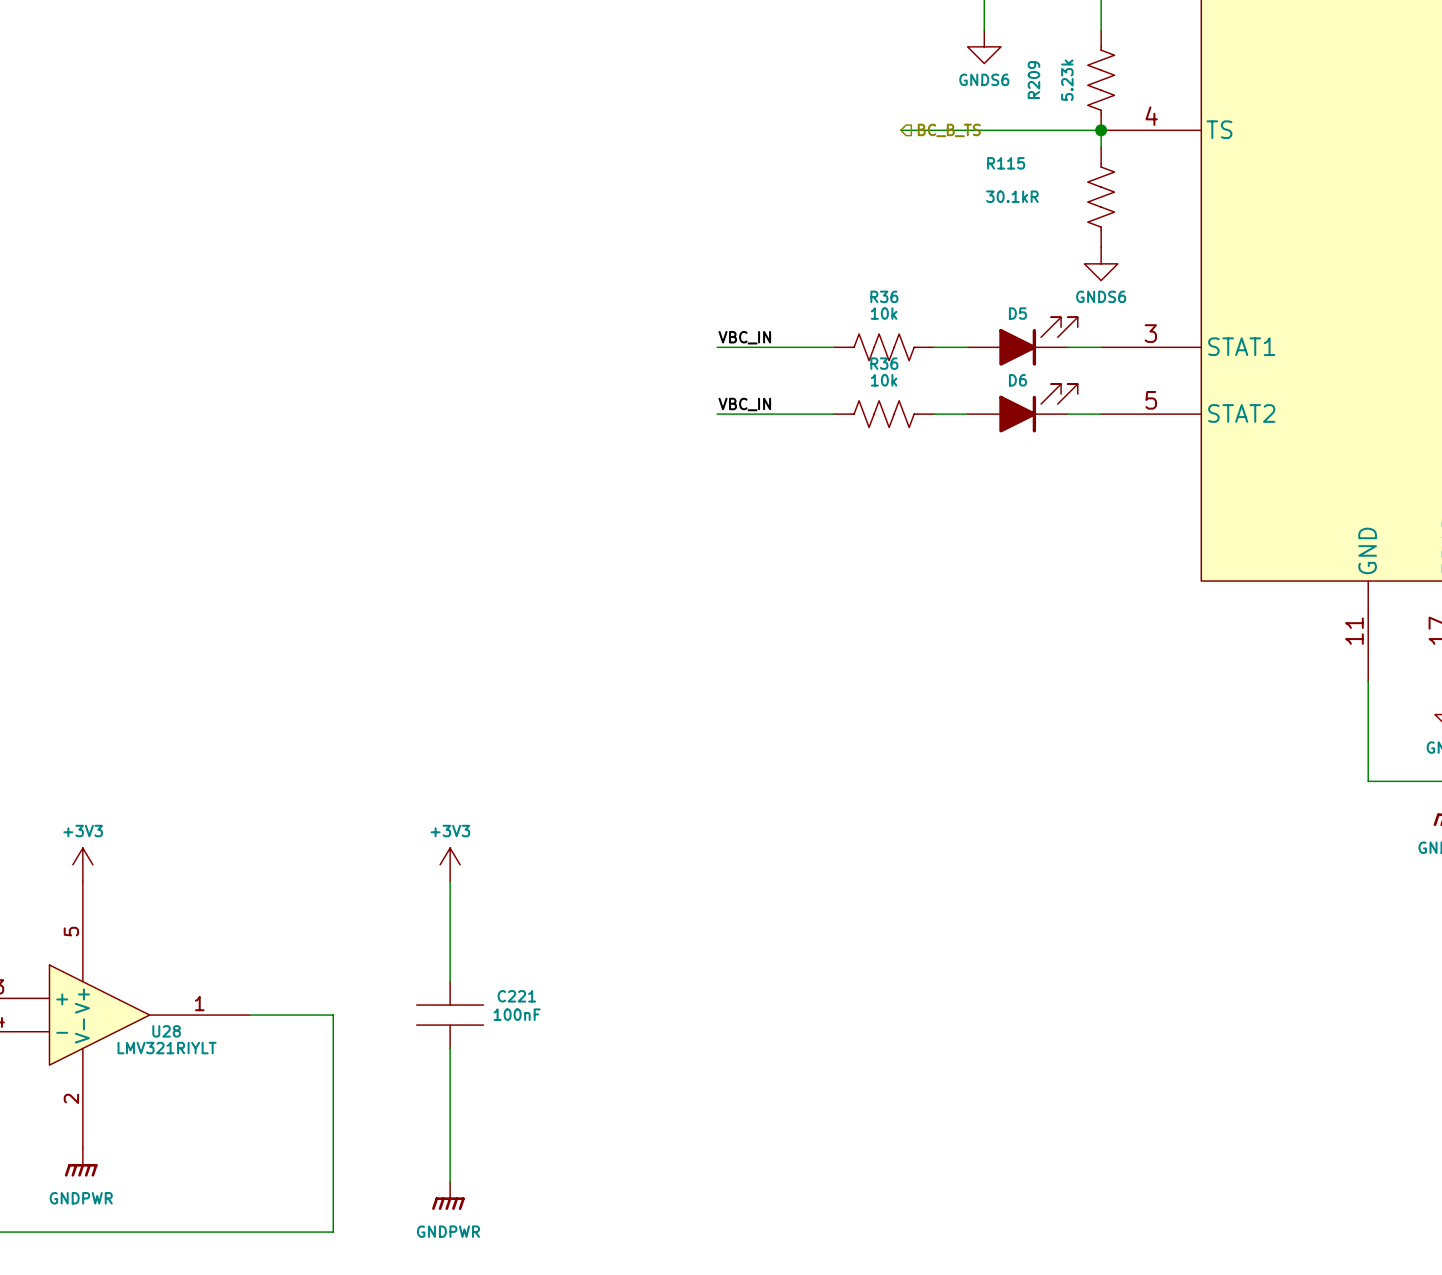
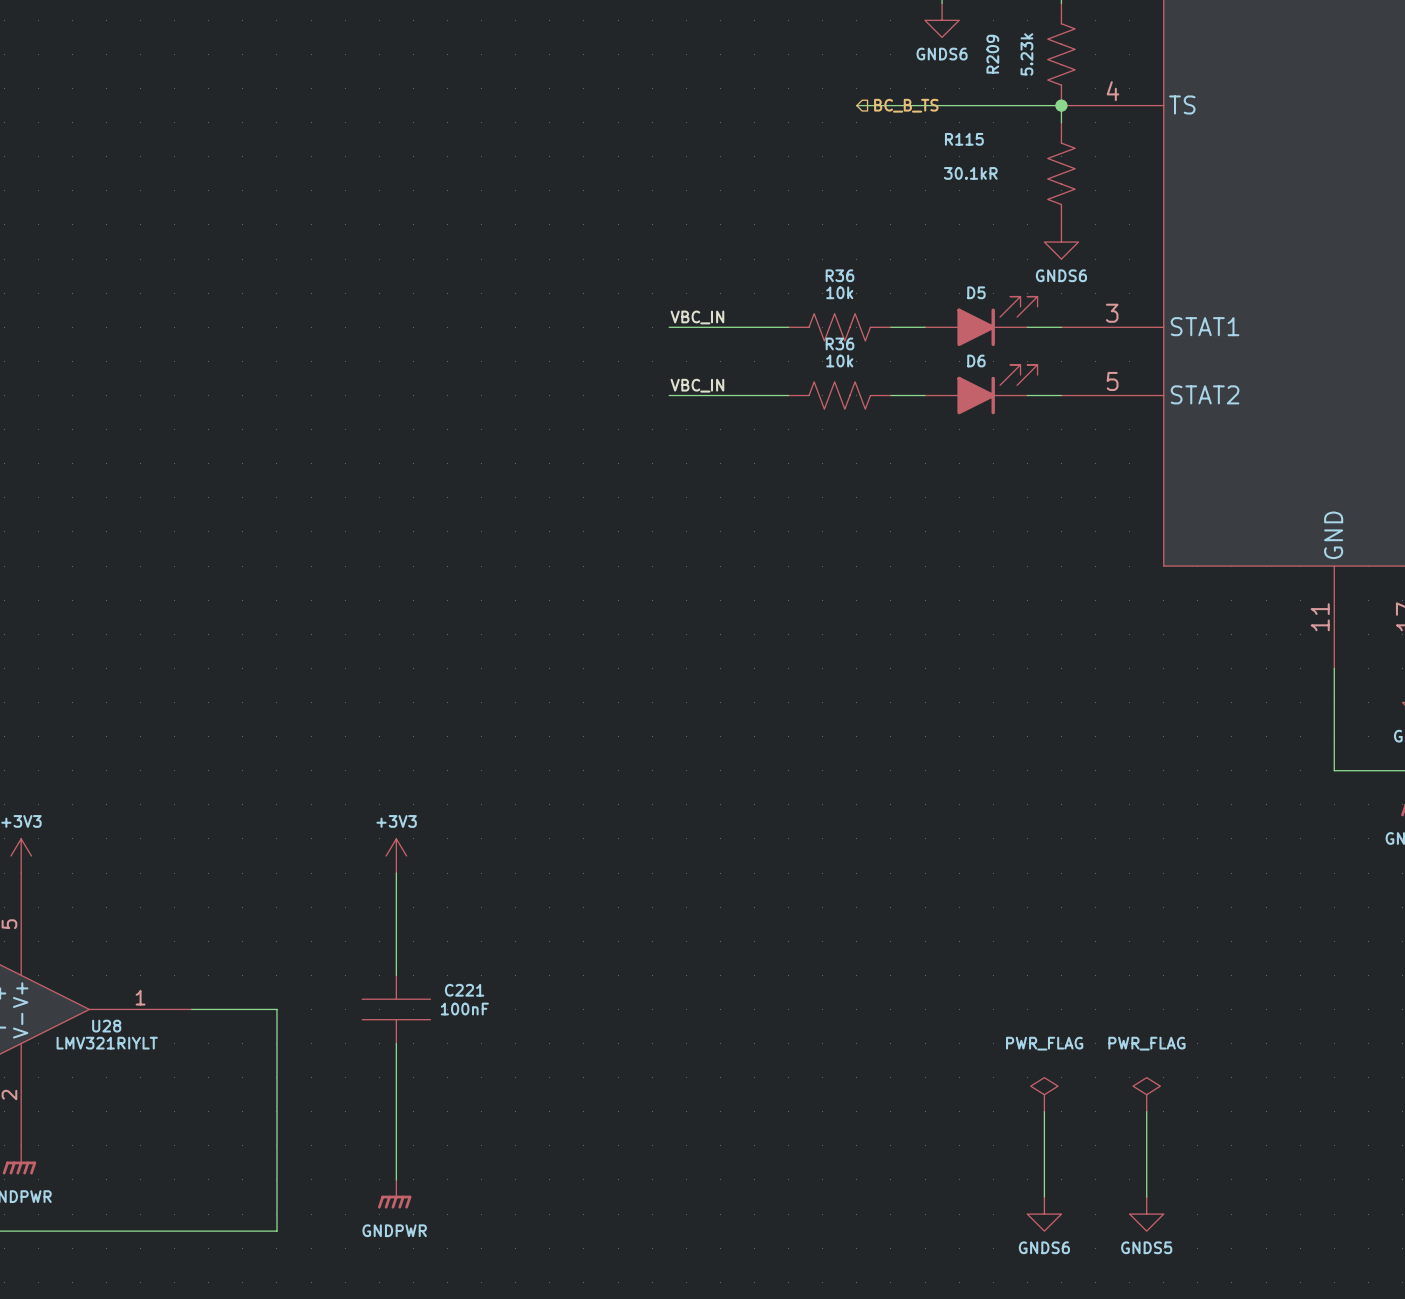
power symbol: none -> PWR_FLAG (1044, 1094)
power symbol: none -> PWR_FLAG (1146, 1094)
wire: none -> (1044, 1111) (1044, 1197)
wire: none -> (1146, 1111) (1146, 1197)
power symbol: none -> GNDS6 (1044, 1214)
power symbol: none -> GNDS5 (1146, 1214)

